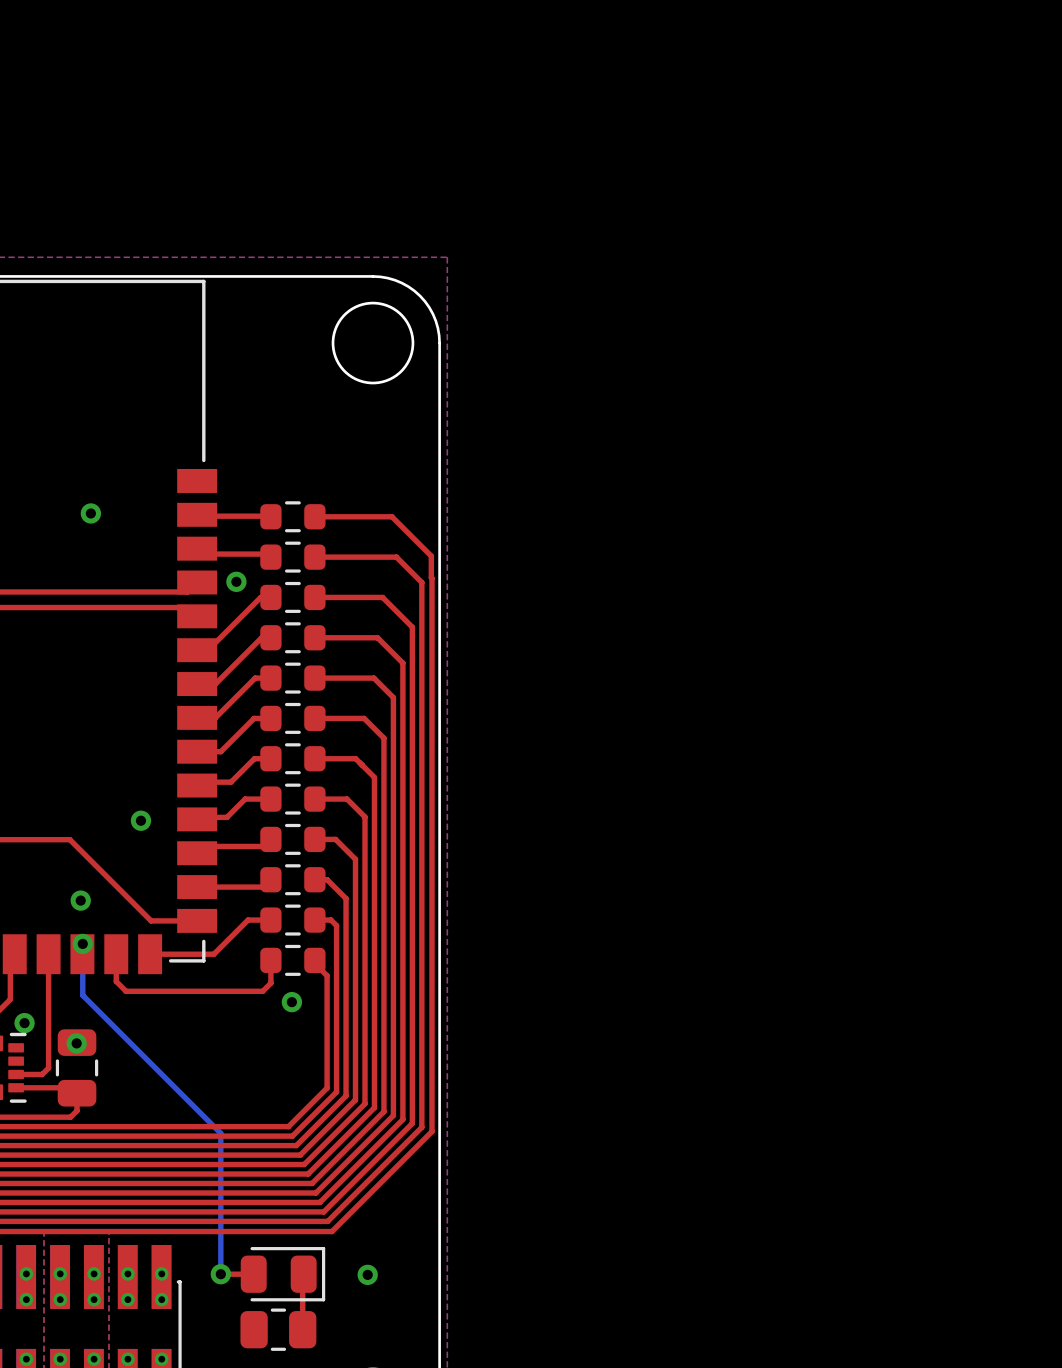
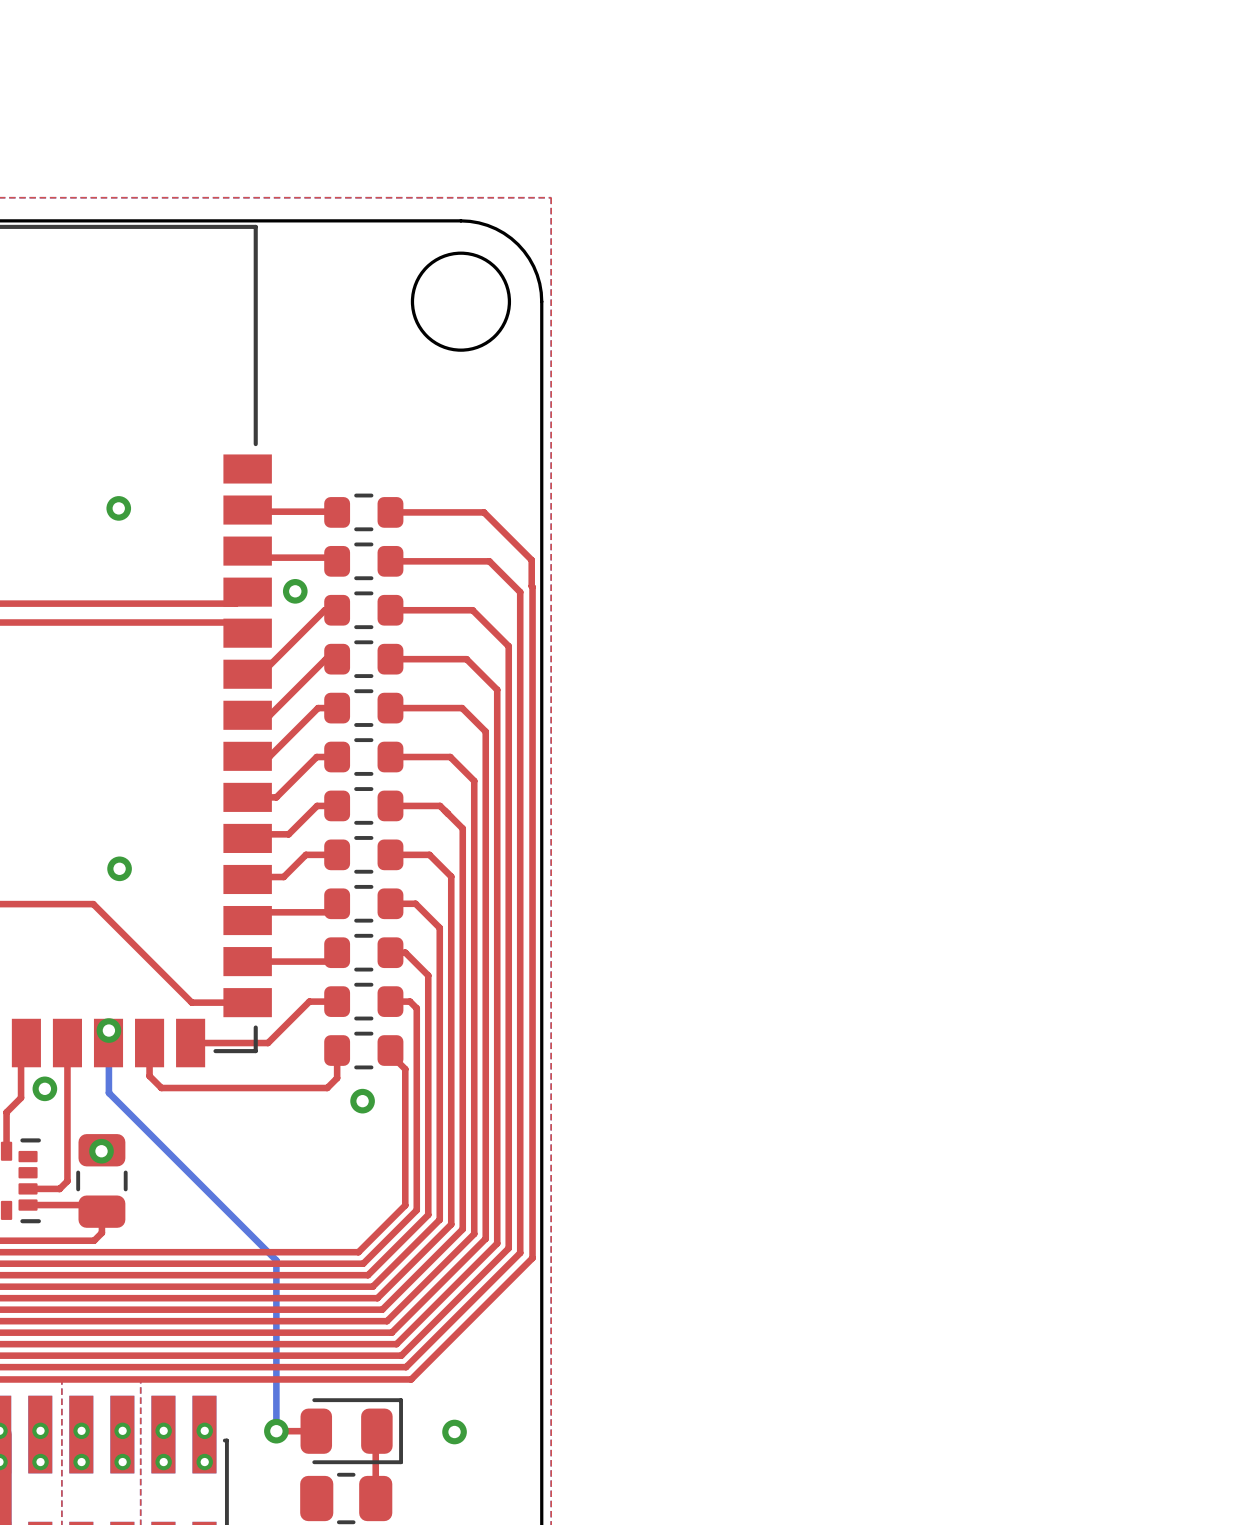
via: none -> (119, 868)
via: (140, 820) -> none
via: (80, 900) -> none
via position: (24, 1023) -> (44, 1088)

